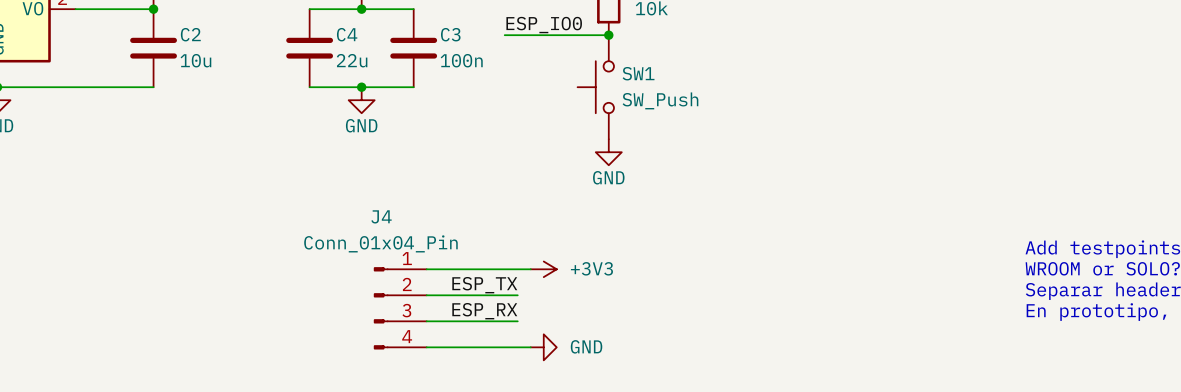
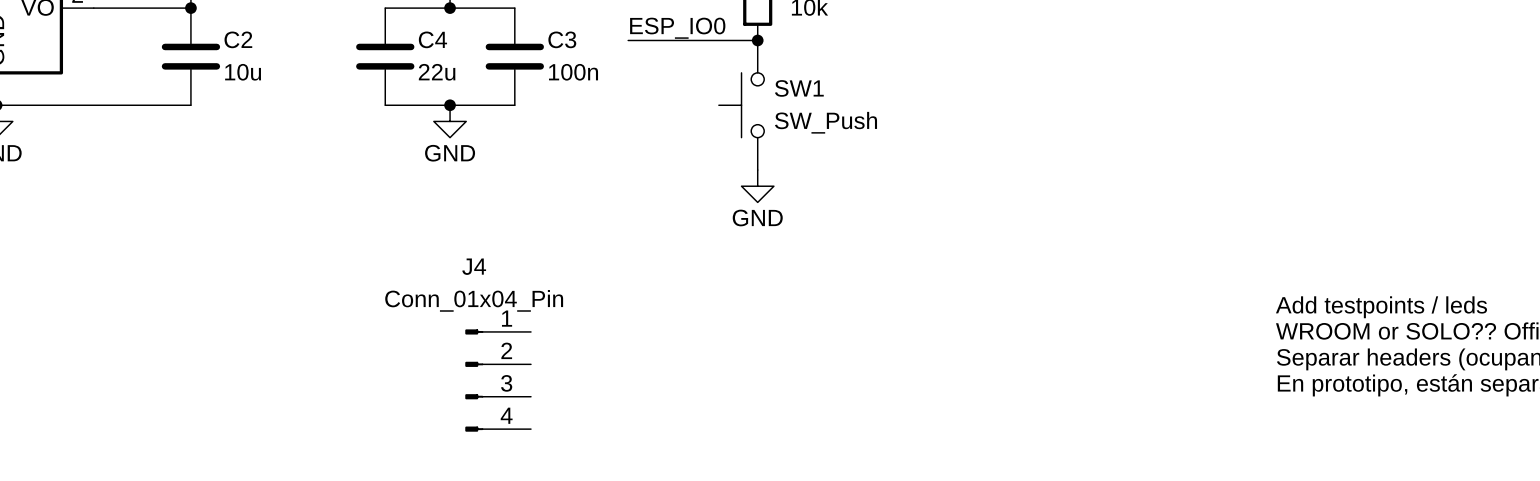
wire: (426, 269) (530, 269) -> none
power symbol: +3V3 (543, 269) -> none
label: ESP_TX (484, 285) -> none
wire: (426, 295) (517, 295) -> none
label: ESP_RX (484, 311) -> none
wire: (426, 321) (517, 321) -> none
wire: (426, 347) (530, 347) -> none
power symbol: GND (543, 347) -> none

